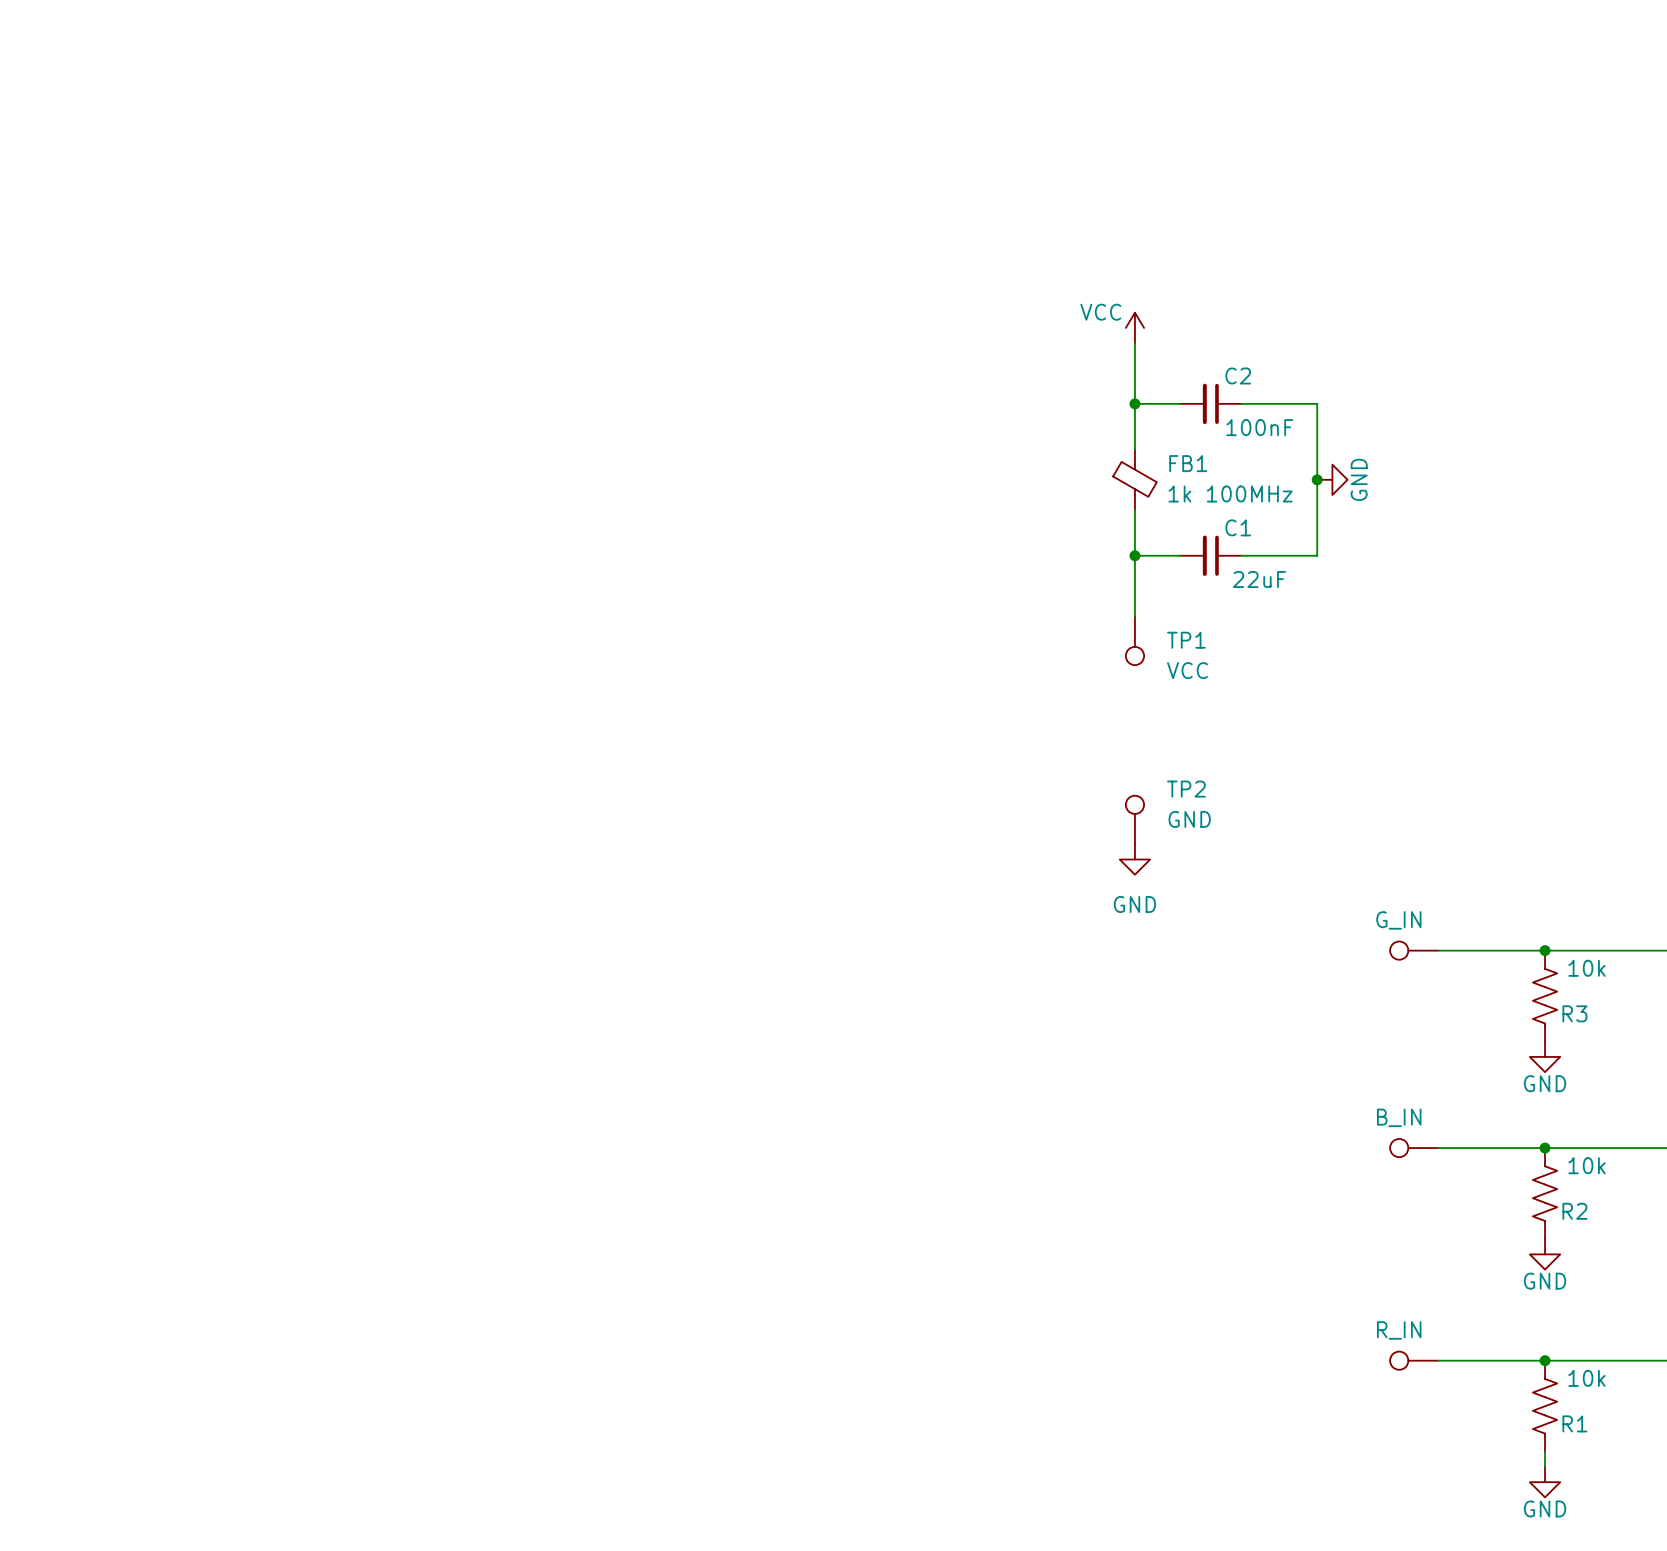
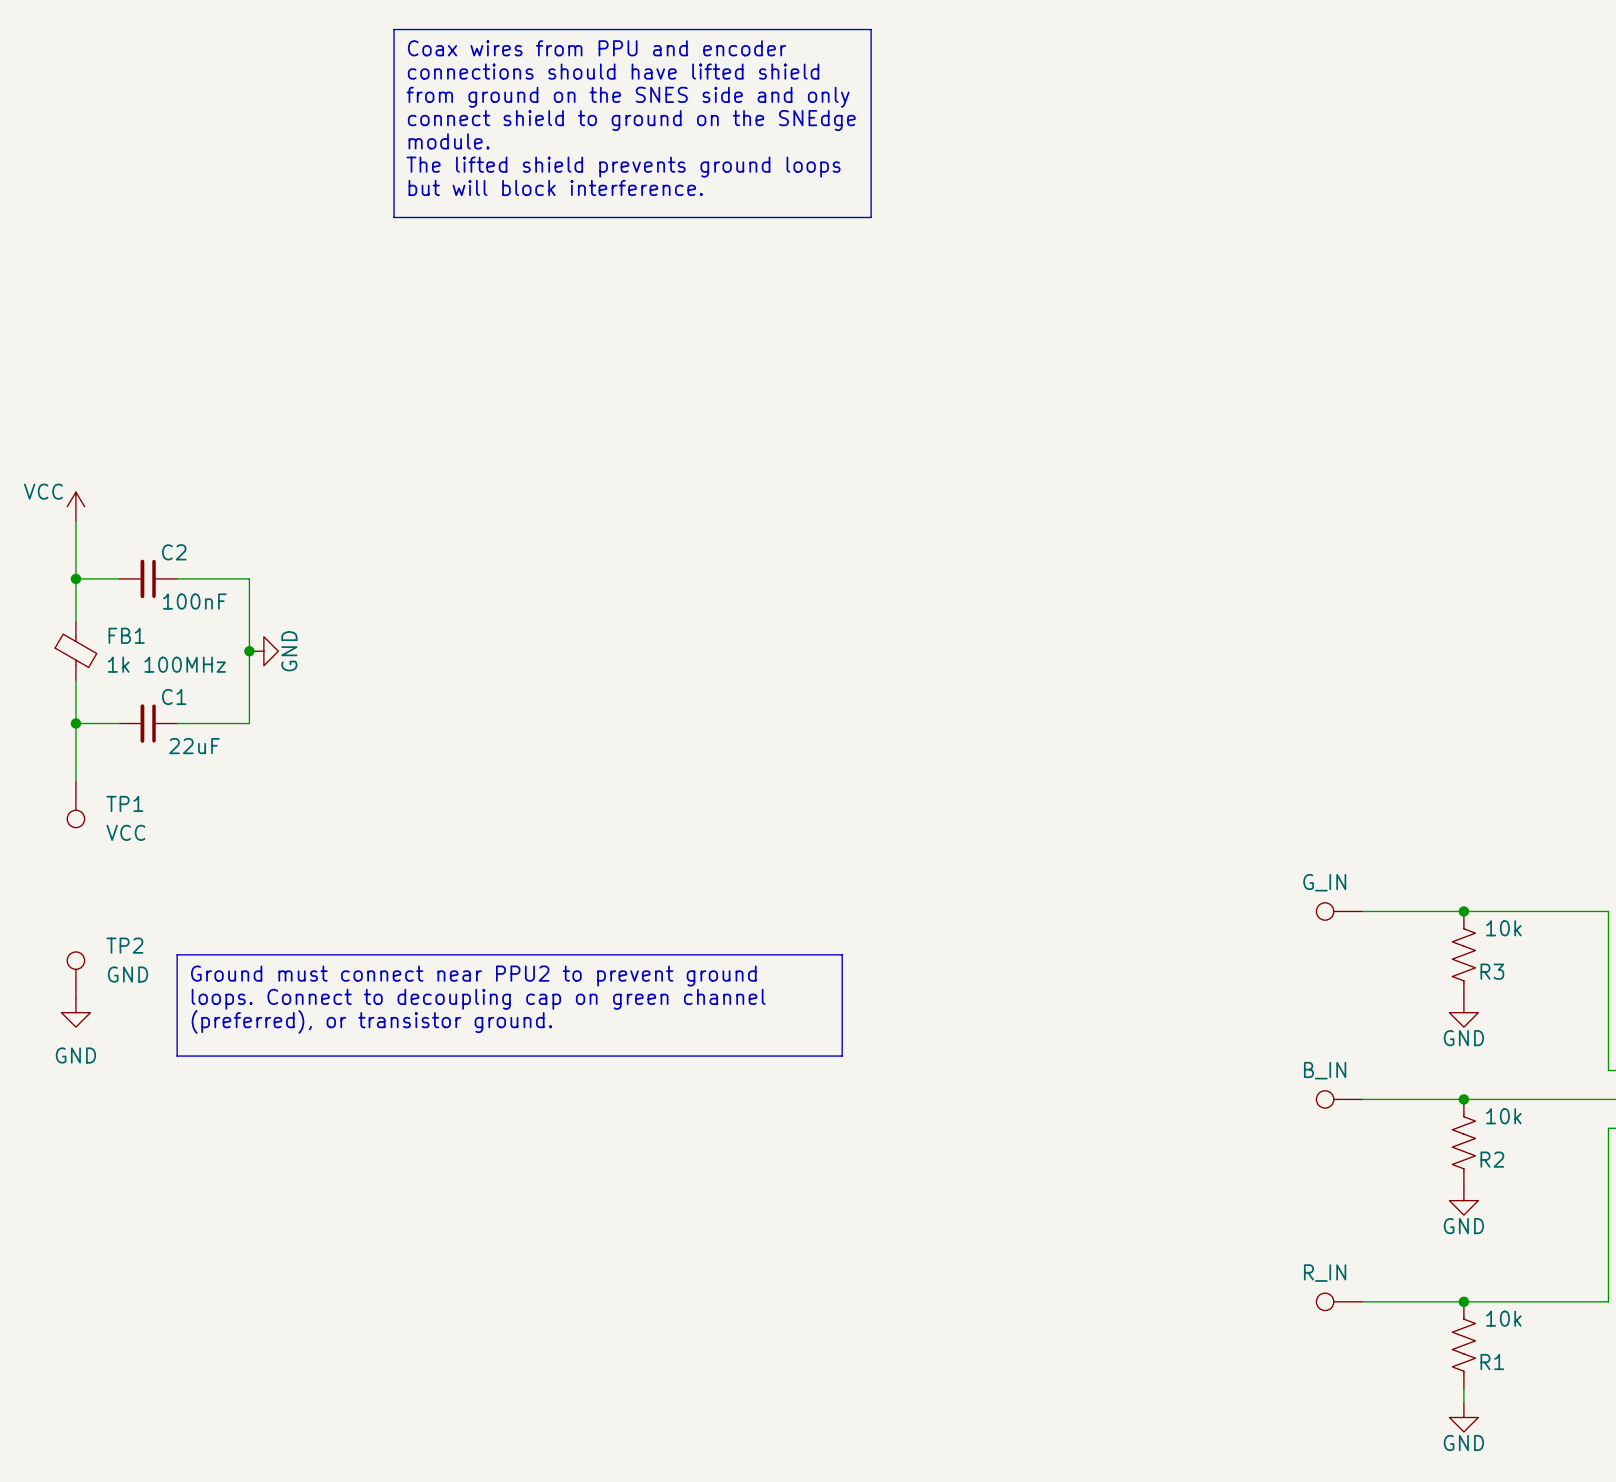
line: none -> (394, 29) (871, 29) (871, 217) (394, 217) (394, 29)
text: none -> Coax wires from PPU and encoder (597, 48)
text: none -> connections should have lifted shield (613, 71)
text: none -> from ground on the SNES side and only (628, 97)
text: none -> connect shield to ground on the SNEdge (631, 120)
text: none -> module. (449, 141)
text: none -> The lifted shield prevents ground loops (623, 167)
text: none -> but will block interference. (555, 187)
power symbol: VCC (1134, 327) -> none
wire: (1134, 343) (1134, 449) -> none
wire: (1134, 403) (1180, 403) -> none
junction: (1134, 403) -> none
C2 position: (1210, 403) -> (148, 578)
wire: (1241, 403) (1317, 403) (1317, 555) (1241, 555) -> none
FB1 position: (1134, 479) -> (75, 651)
junction: (1317, 479) -> none
power symbol: GND (1332, 479) -> none
wire: (1134, 510) (1134, 616) -> none
power symbol: none -> VCC (75, 506)
wire: none -> (75, 521) (75, 622)
wire: (1134, 555) (1180, 555) -> none
junction: (1134, 555) -> none
C1 position: (1210, 555) -> (148, 723)
wire: none -> (75, 578) (119, 578)
junction: none -> (75, 578)
wire: none -> (177, 578) (249, 578) (249, 723) (177, 723)
TP1 position: (1134, 640) -> (75, 804)
junction: none -> (249, 651)
power symbol: none -> GND (263, 651)
wire: none -> (75, 680) (75, 781)
wire: none -> (75, 723) (119, 723)
junction: none -> (75, 723)
TP2 position: (1134, 820) -> (75, 975)
power symbol: GND (1134, 859) -> none
line: none -> (177, 954) (842, 954) (842, 1056) (177, 1056) (177, 954)
text: none -> Ground must connect near PPU2 to prevent ground (473, 976)
text: none -> loops. Connect to decoupling cap on green channel (478, 999)
power symbol: none -> GND (75, 1012)
text: none -> (preferred), or transistor ground. (371, 1021)

